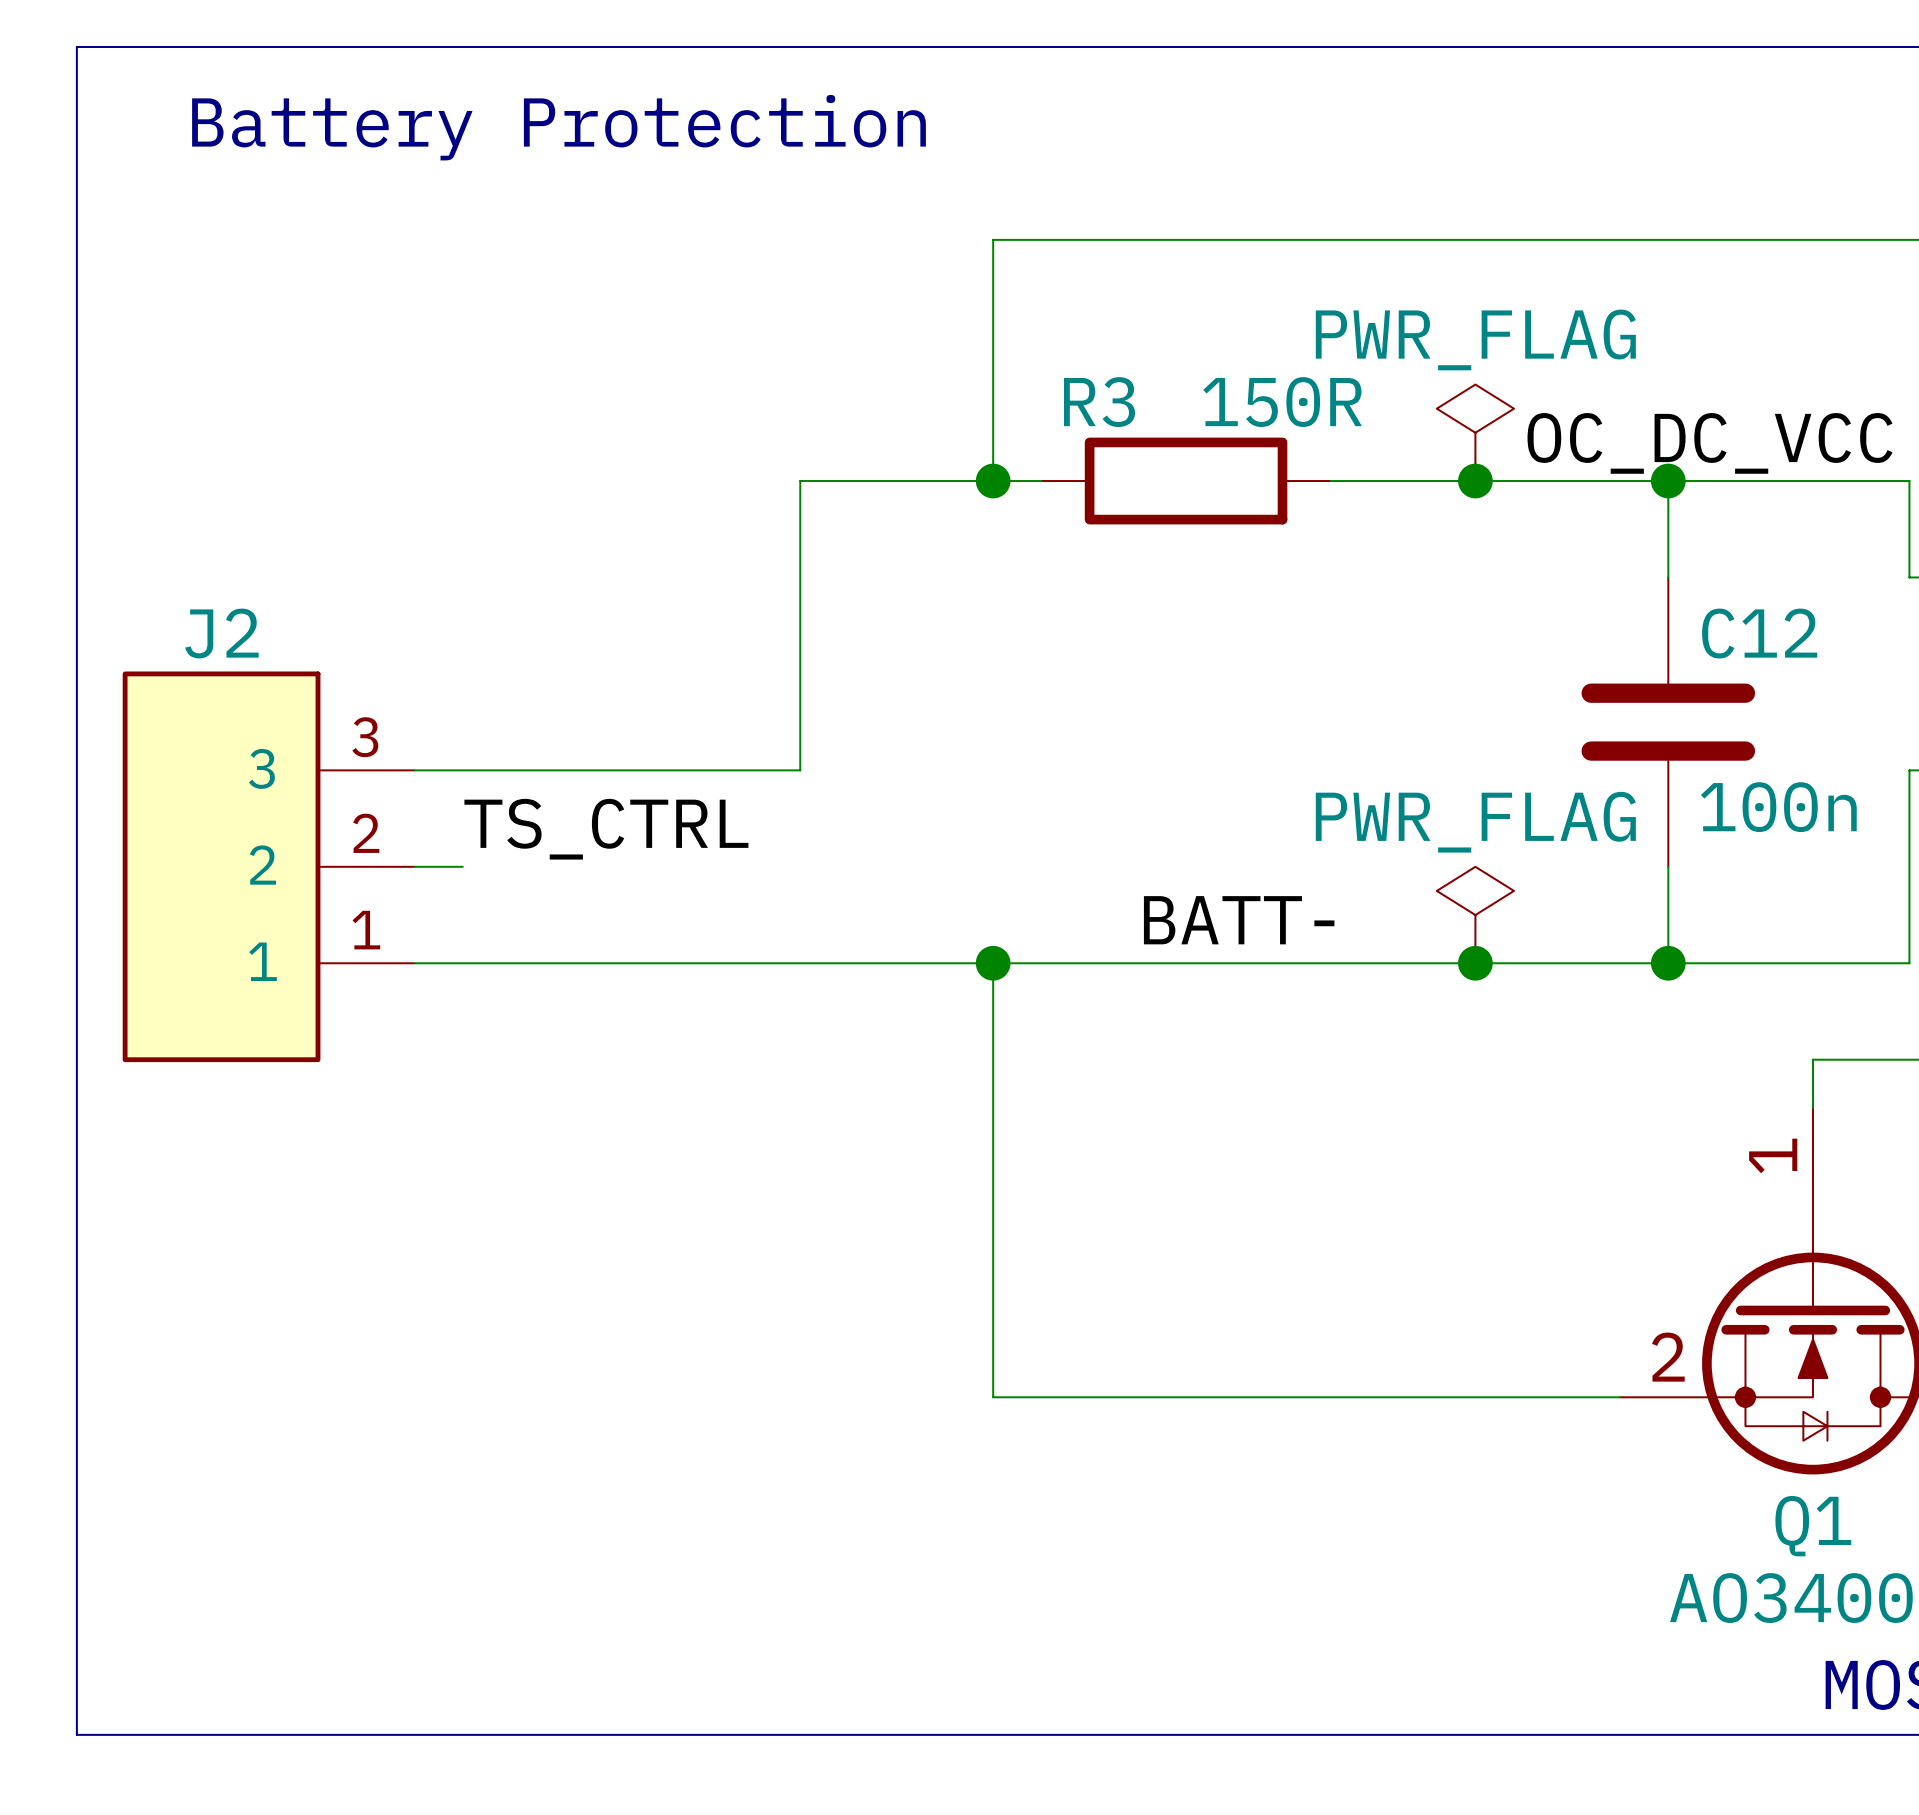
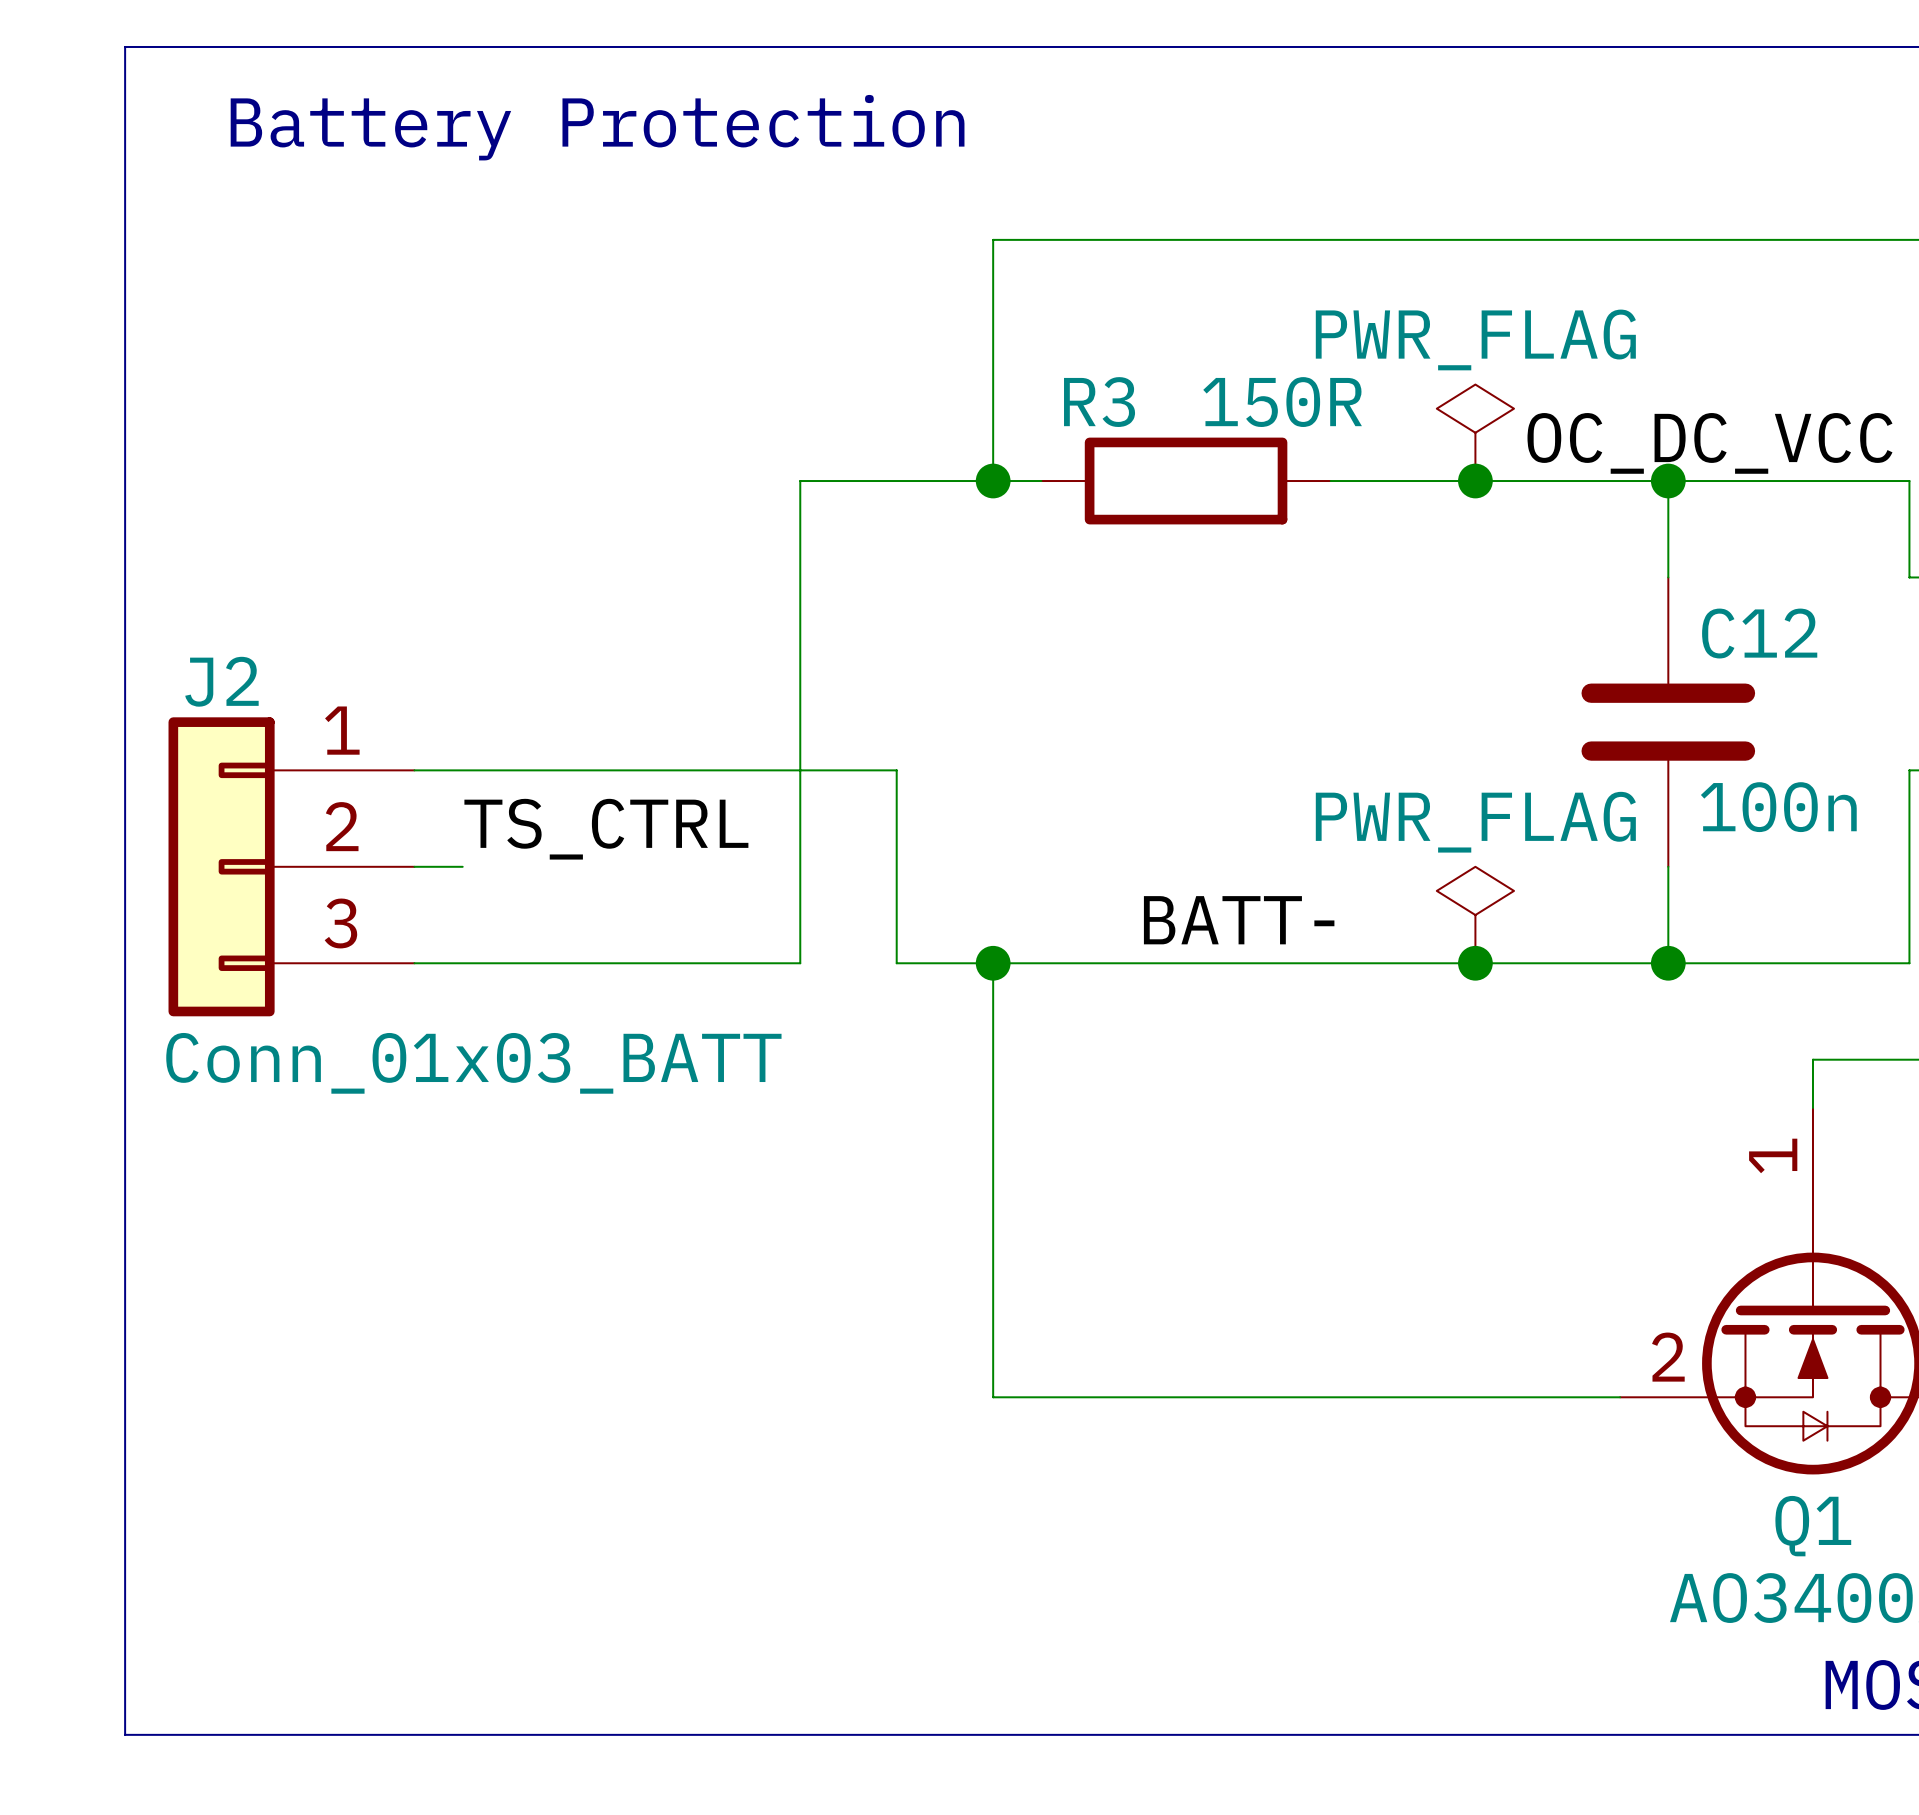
line: (125, 46) (76, 46) (76, 1734) (125, 1734) -> (125, 46) (125, 1734)
text position: Battery Protection (559, 127) -> Battery Protection (597, 127)
J2 symbol: [122, 671, 415, 1063] -> [168, 717, 415, 1017]
wire: (800, 963) (896, 963) -> (800, 963) (800, 770) (896, 770) (896, 963)
J2 value: none -> Conn_01x03_BATT (473, 1063)

